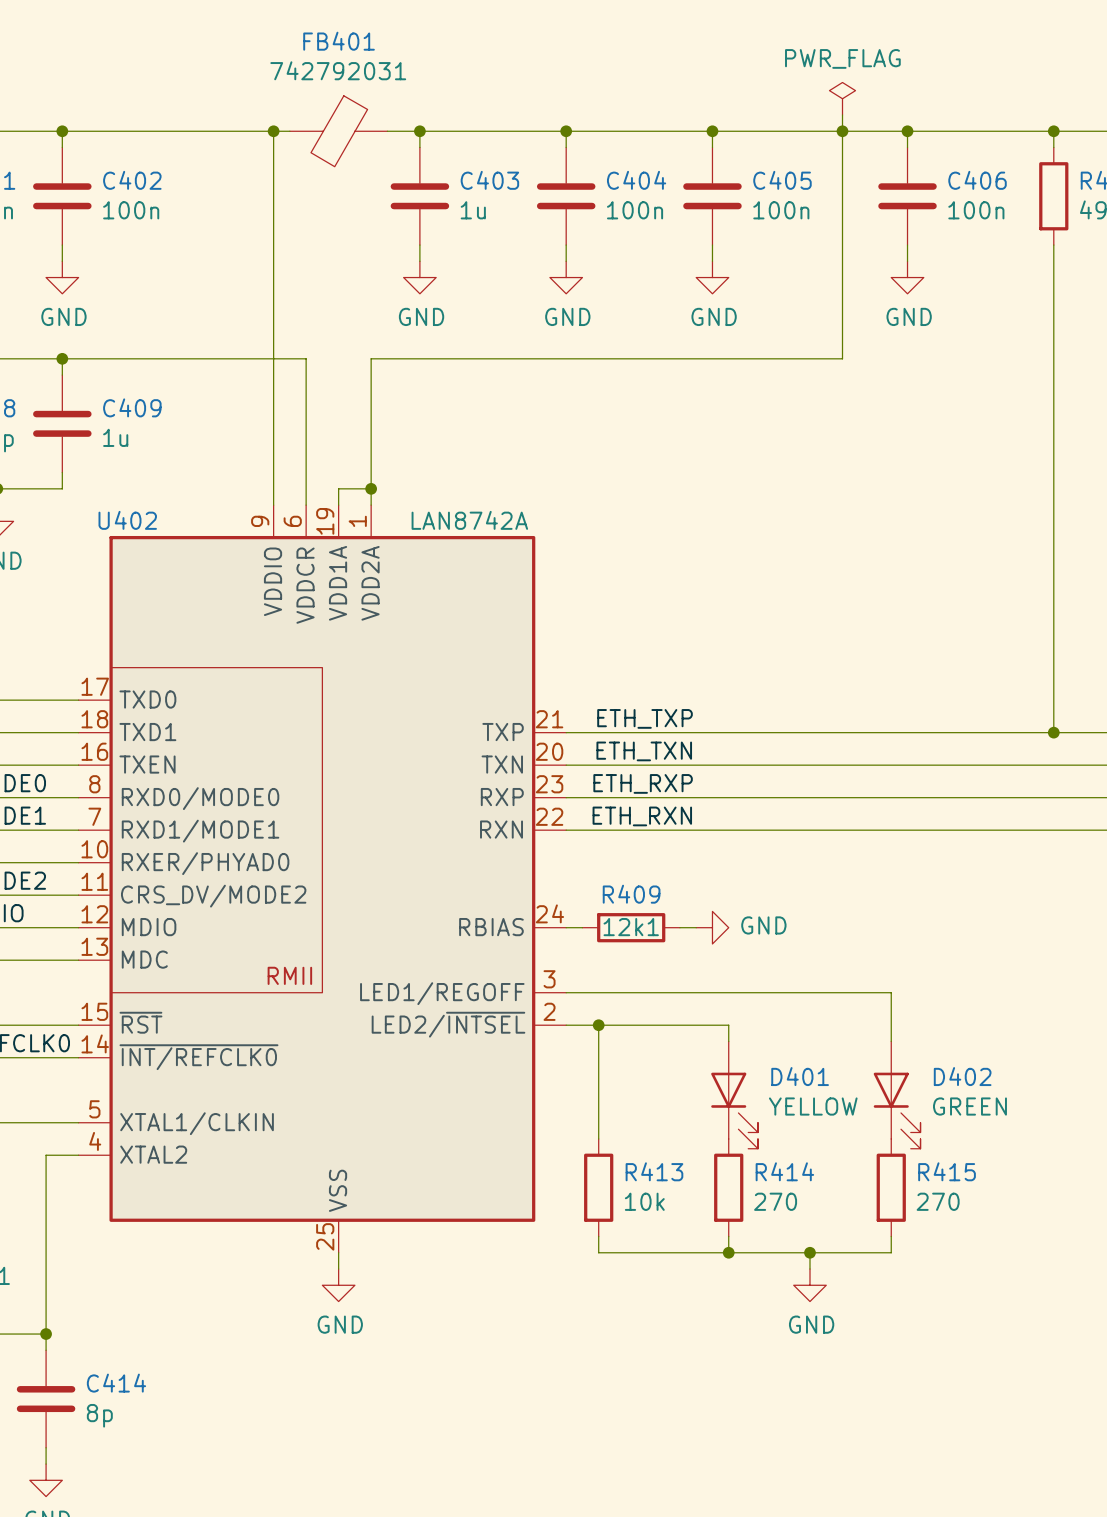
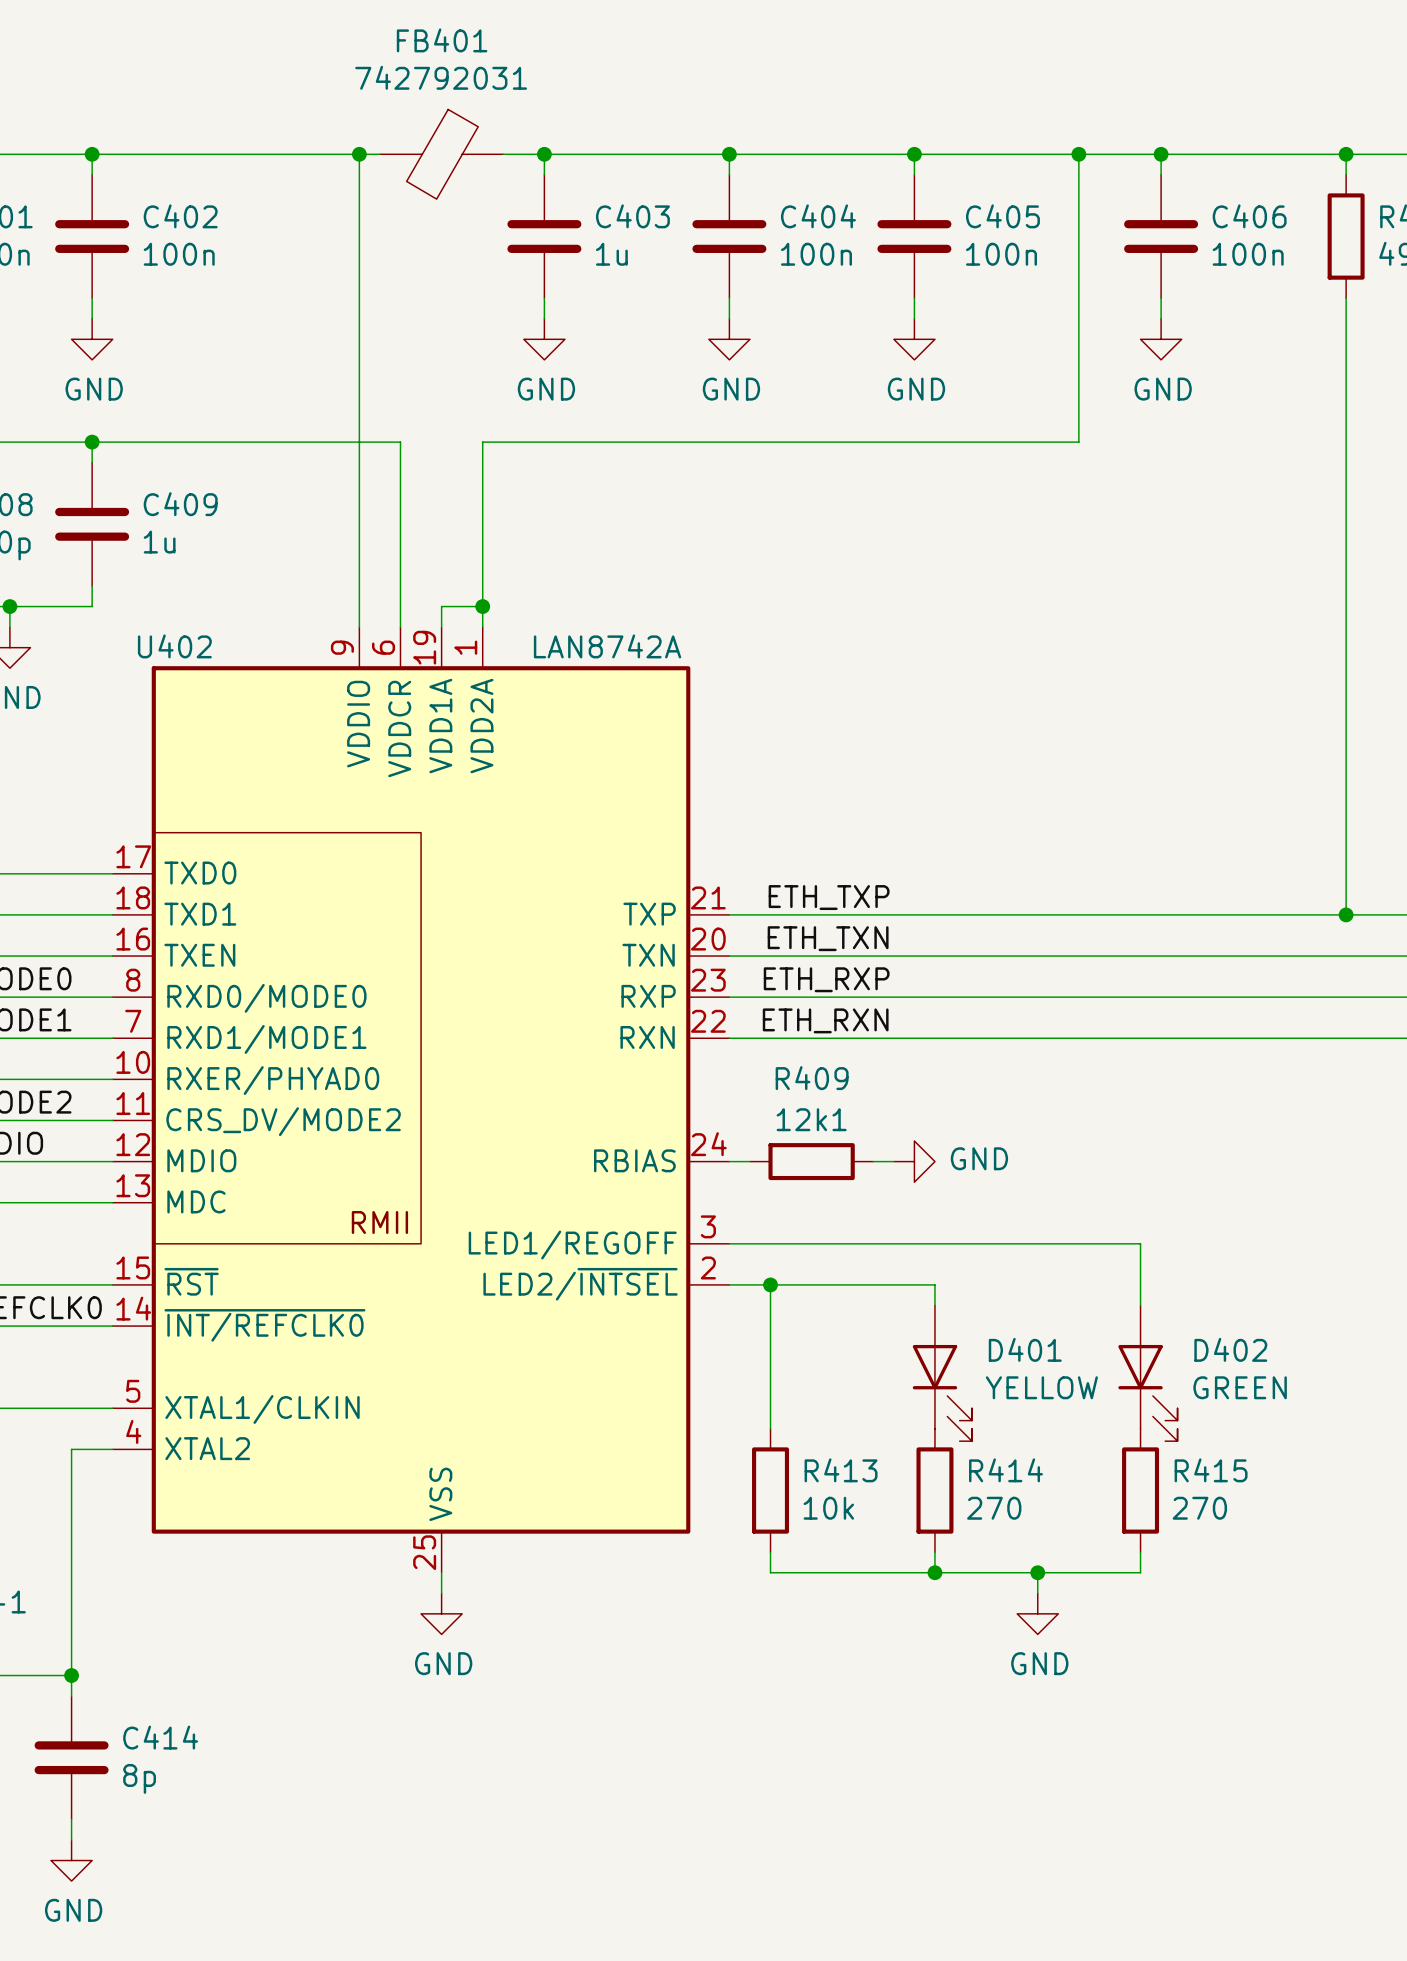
power symbol: PWR_FLAG (842, 98) -> none
wire: (842, 115) (842, 131) -> none
R409 name position: R409 (631, 894) -> R409 (812, 1078)
R409 value position: 12k1 (631, 927) -> 12k1 (811, 1119)

